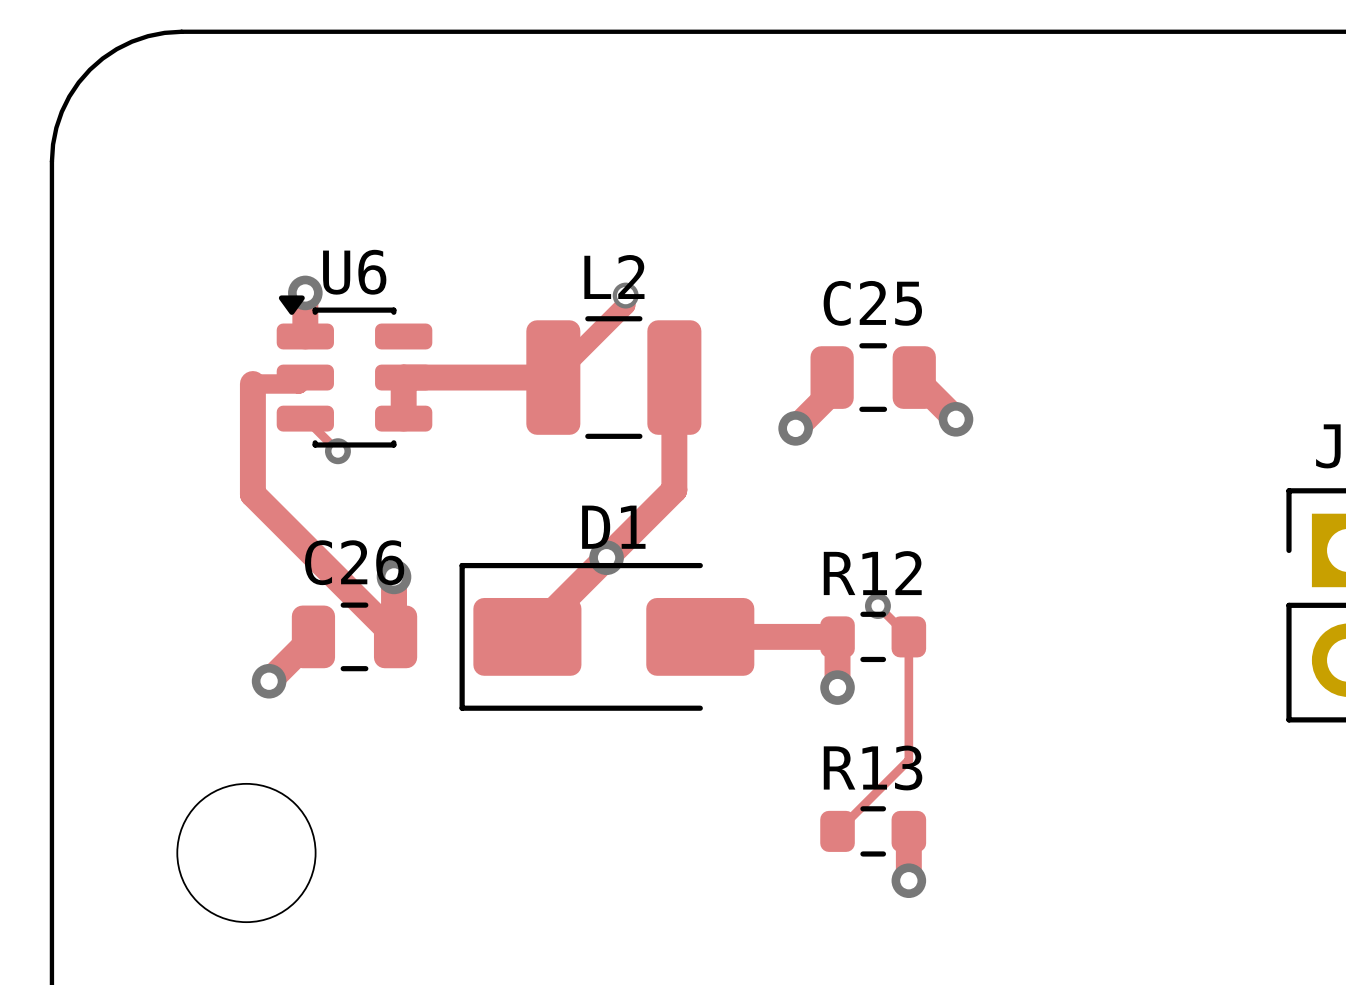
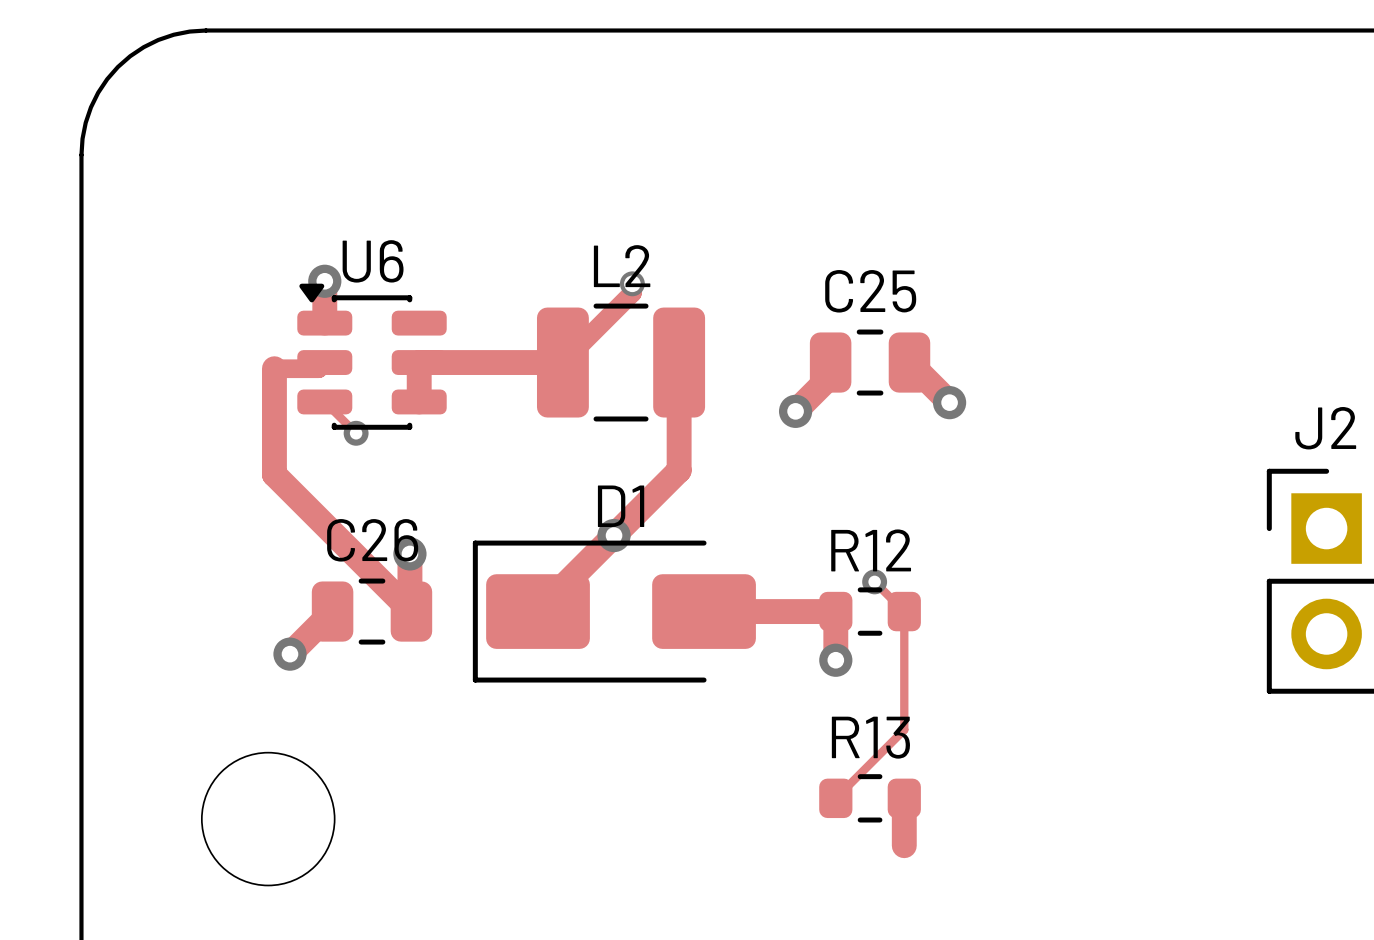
via: (908, 880) -> none

